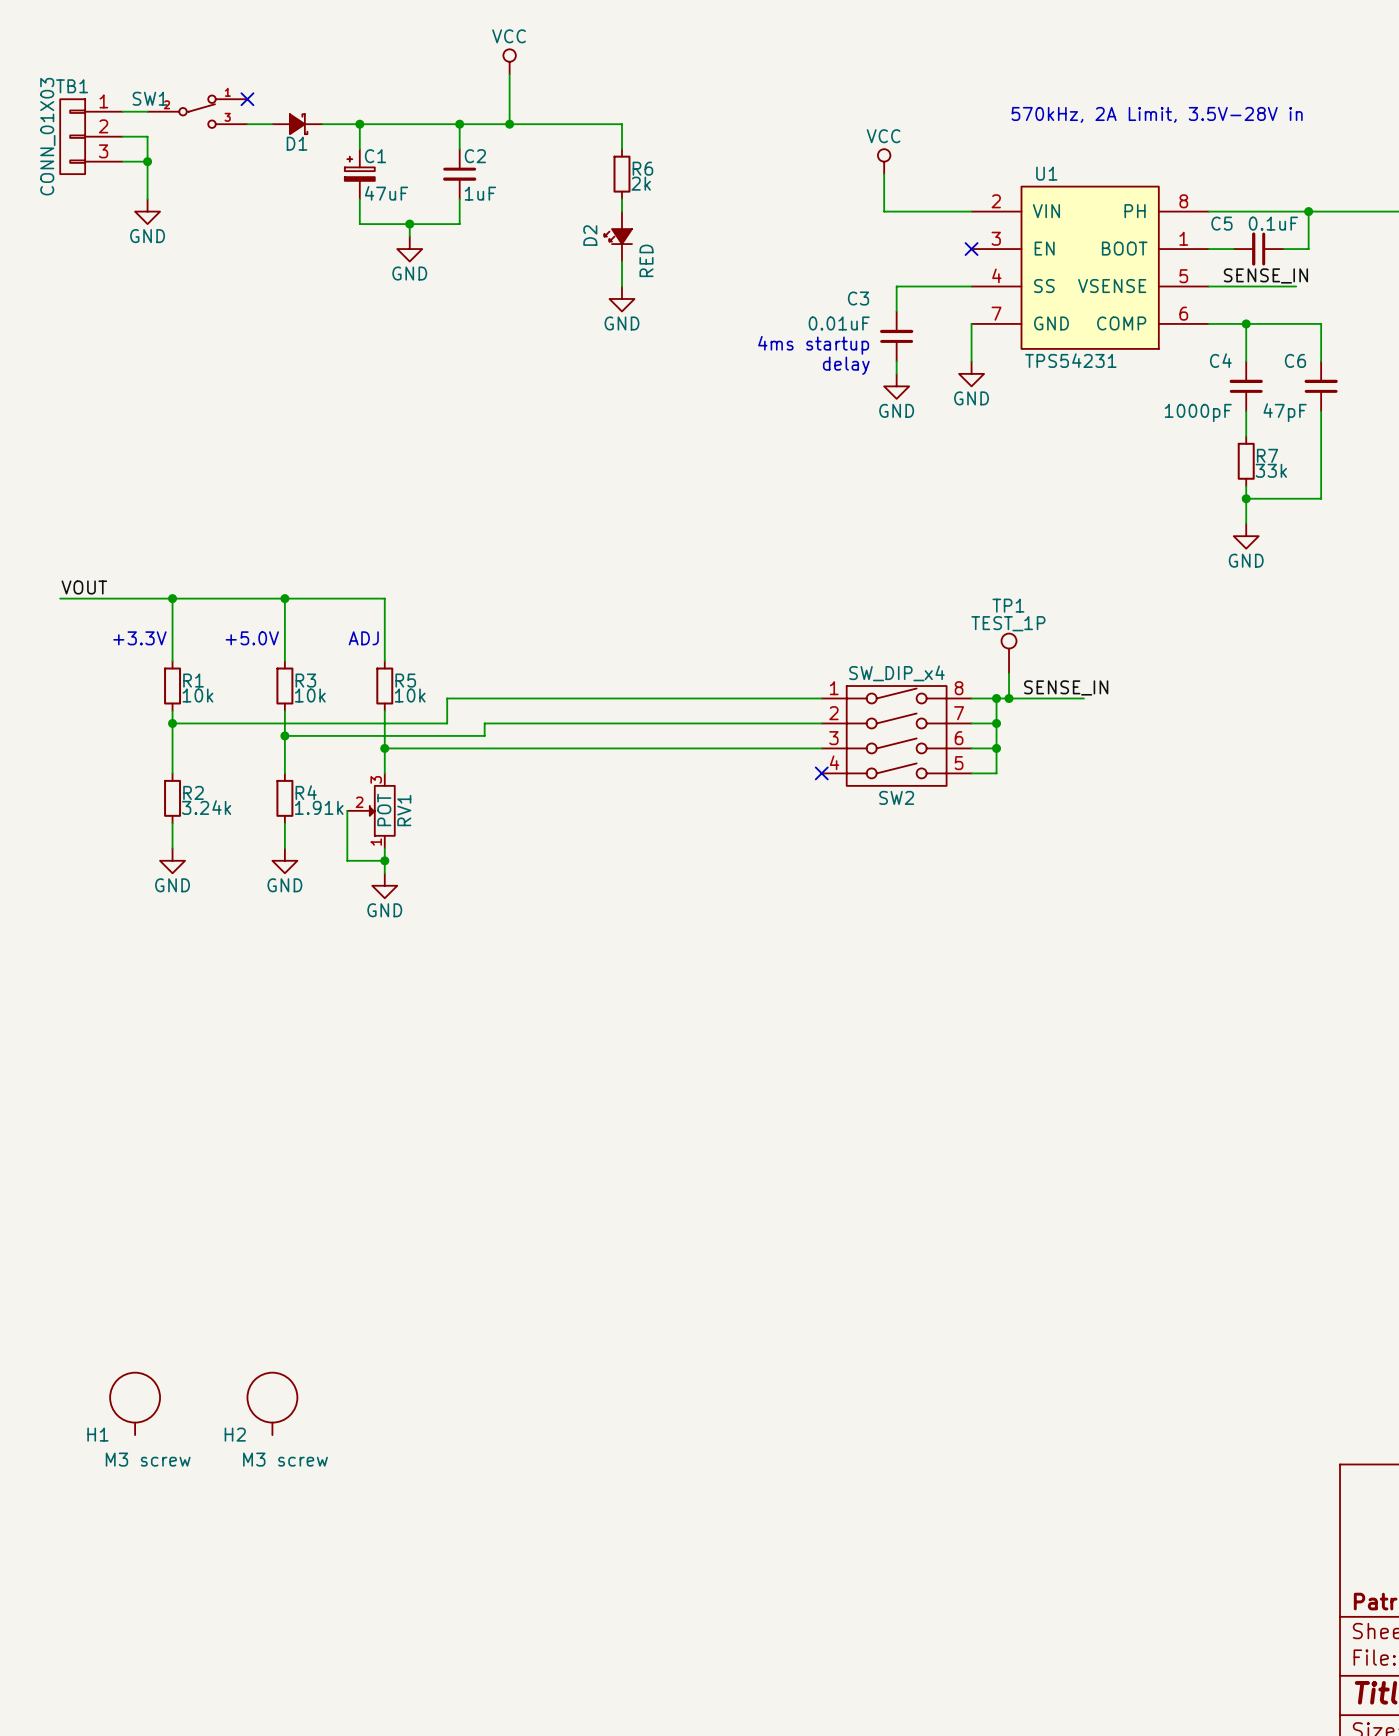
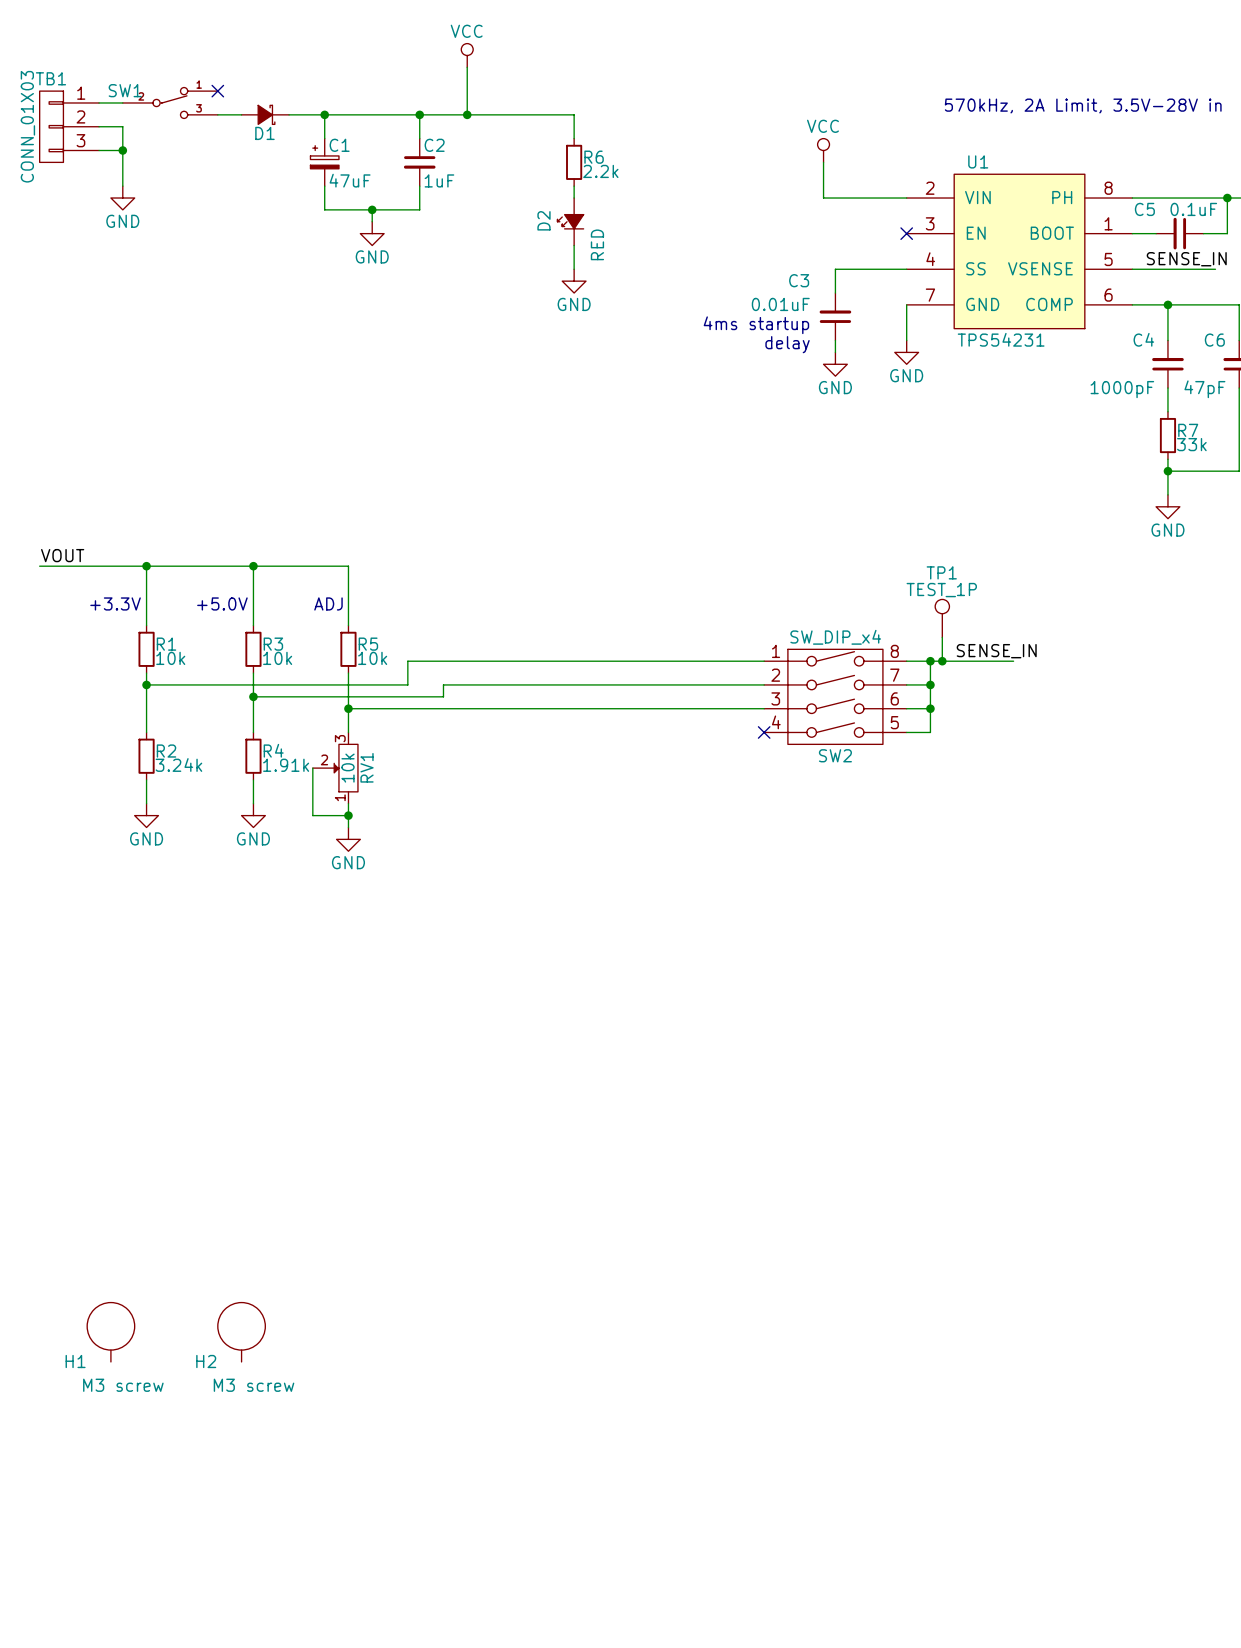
R6 value: 2k (641, 183) -> 2.2k (600, 171)
RV1 value: POT (384, 809) -> 10k (348, 768)

